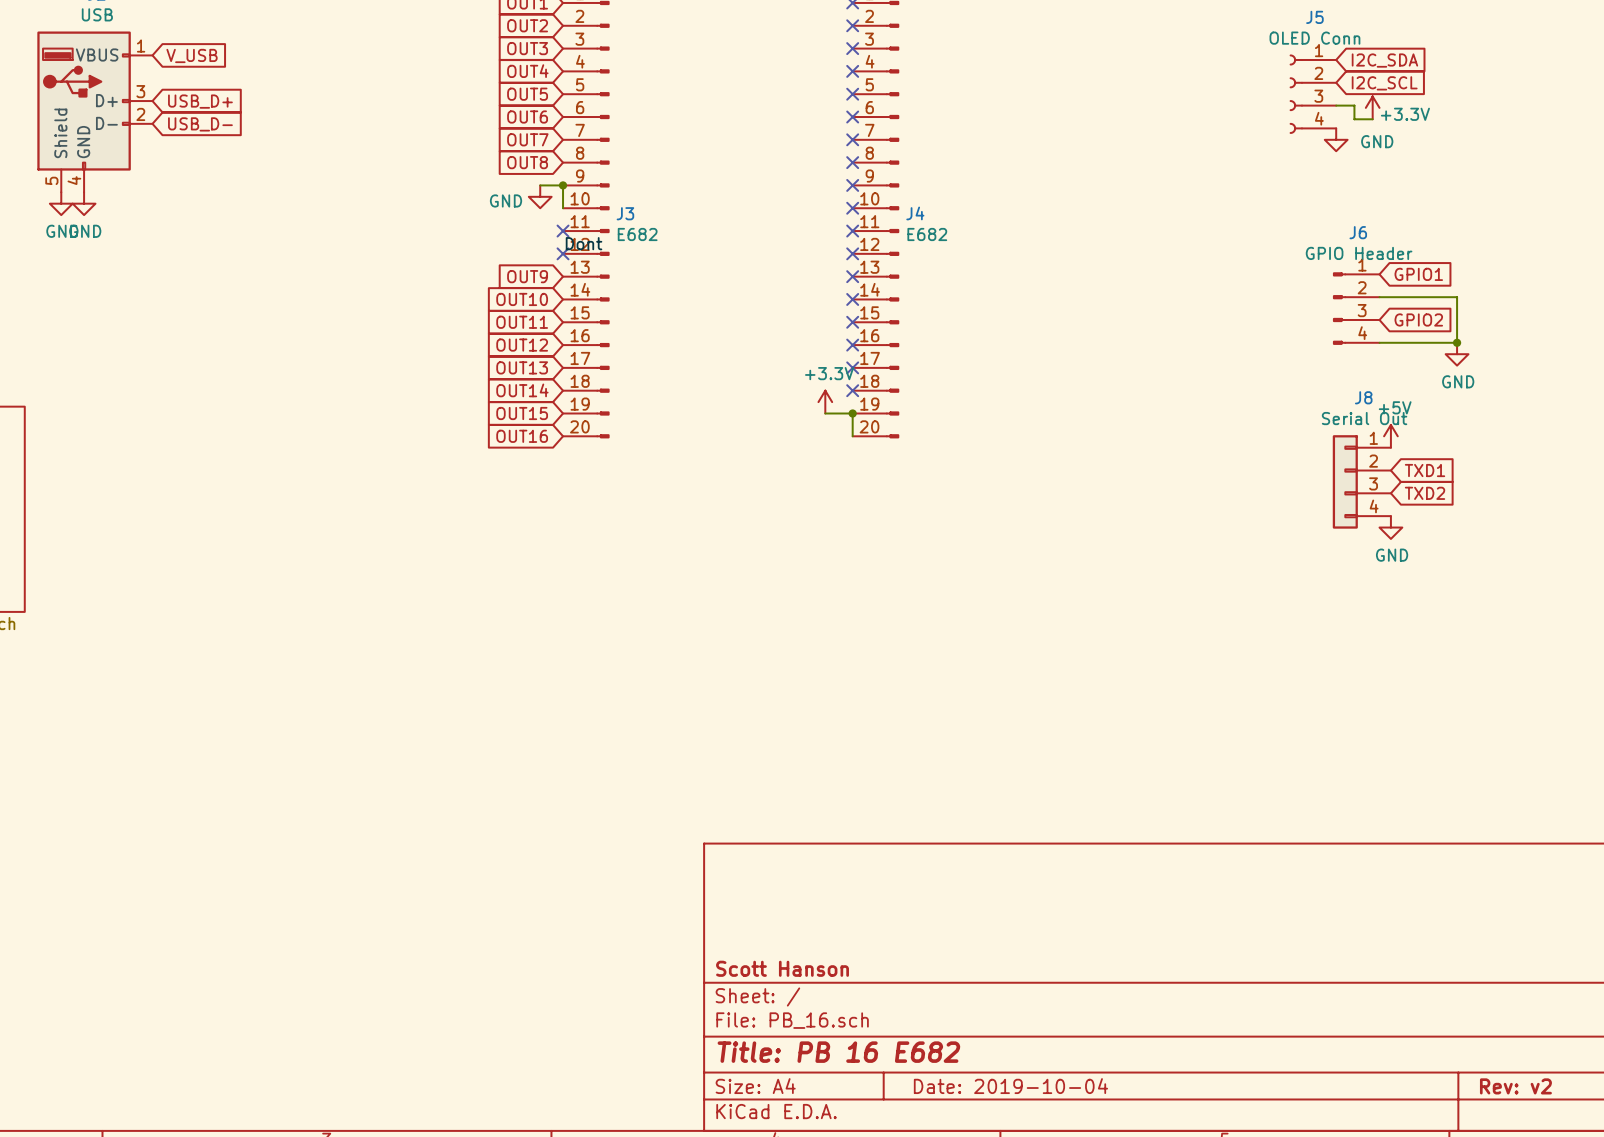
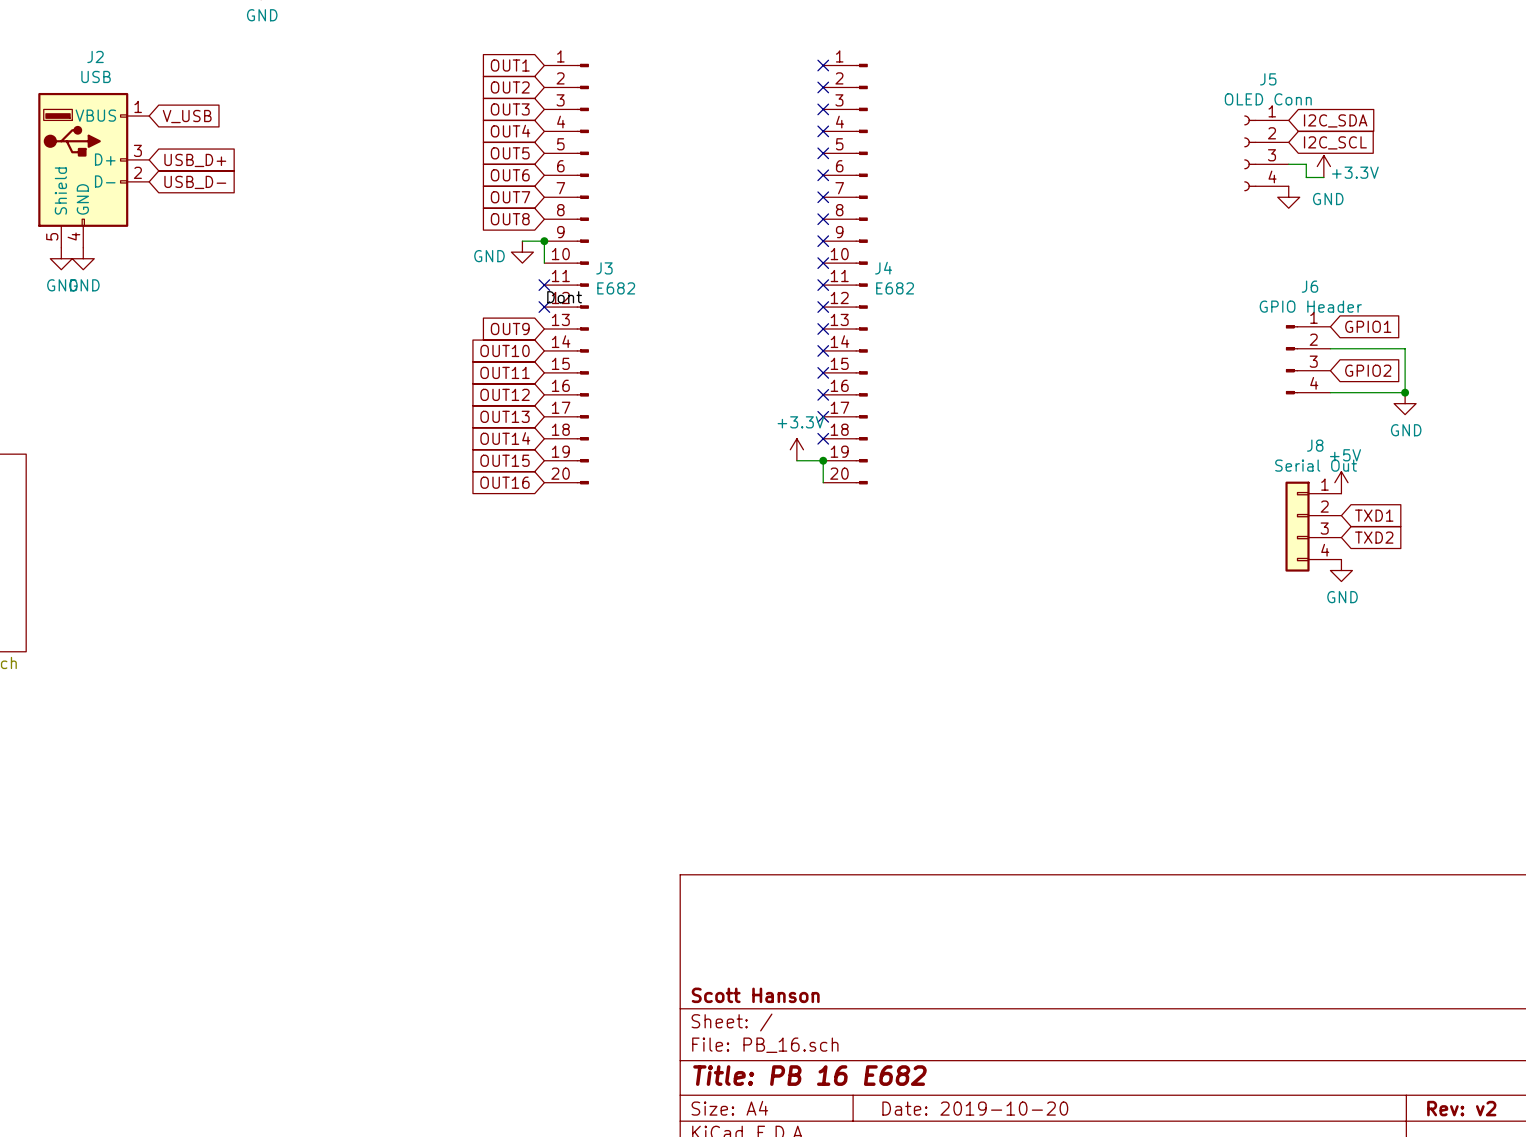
title block: Date: 2019-10-04 (1010, 1086) -> Date: 2019-10-20 (975, 1108)

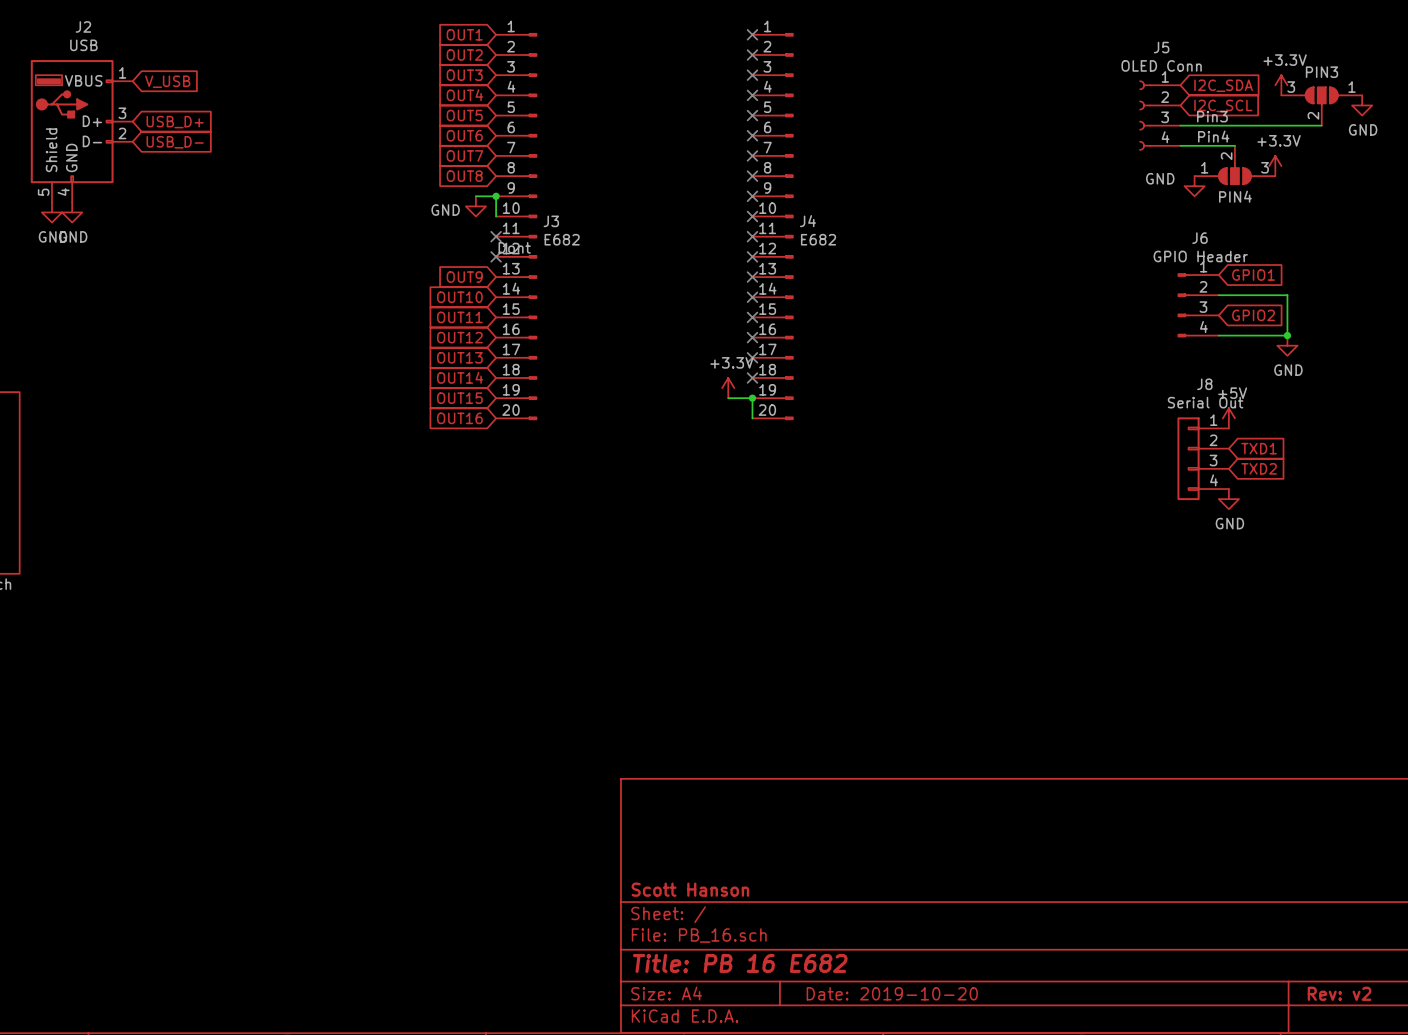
power symbol: none -> +3.3V (1281, 85)
power symbol: none -> GND (1362, 105)
PIN3: none -> (1321, 106)
label: none -> Pin3 (1212, 116)
wire: (1306, 164) (1306, 177) (1323, 177) -> (1196, 125) (1321, 125)
power symbol: +3.3V (1323, 166) -> none
label: none -> Pin4 (1213, 136)
wire: none -> (1180, 145) (1234, 145)
power symbol position: GND (1288, 197) -> GND (1194, 186)
power symbol text position: GND (1328, 199) -> GND (1160, 178)
PIN4: none -> (1234, 165)
power symbol: none -> +3.3V (1275, 166)

